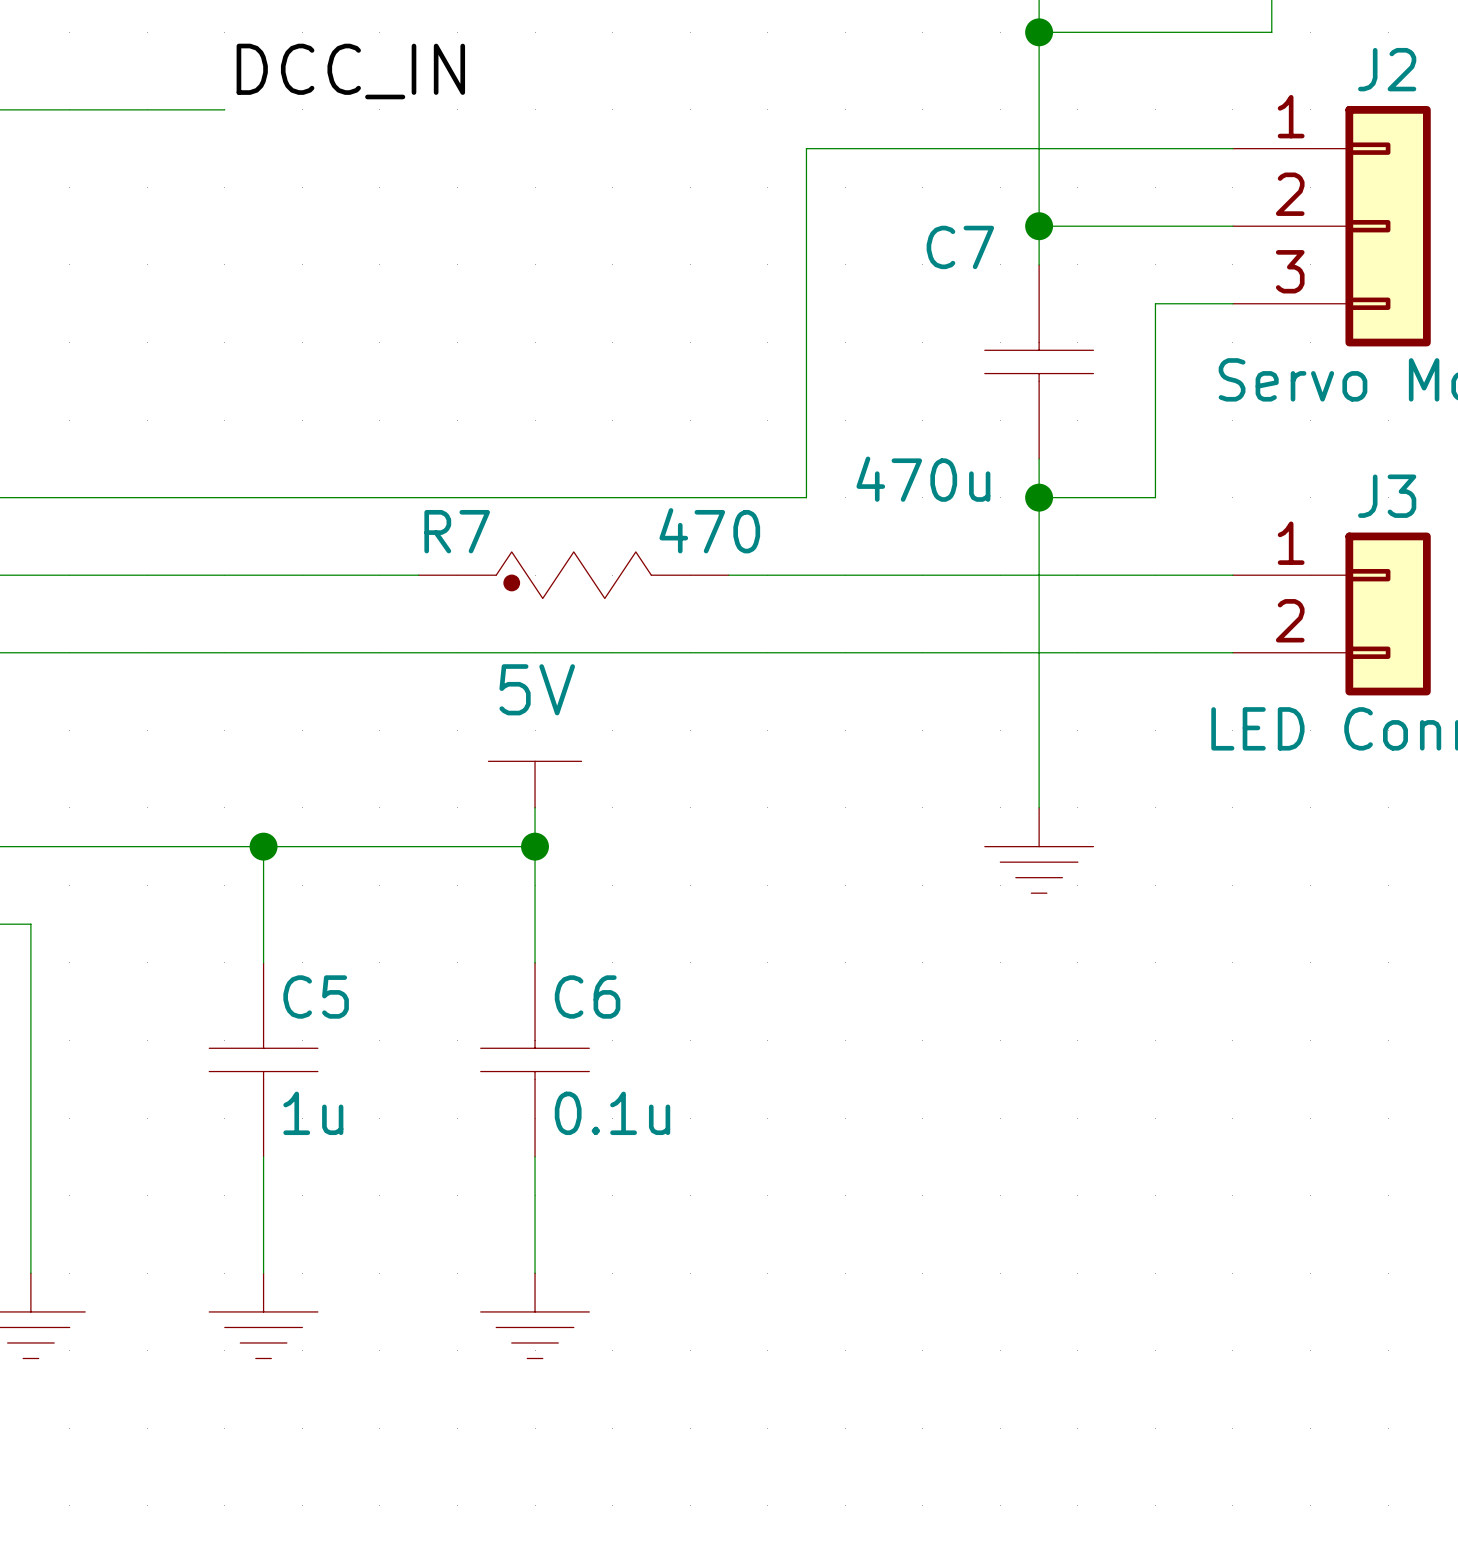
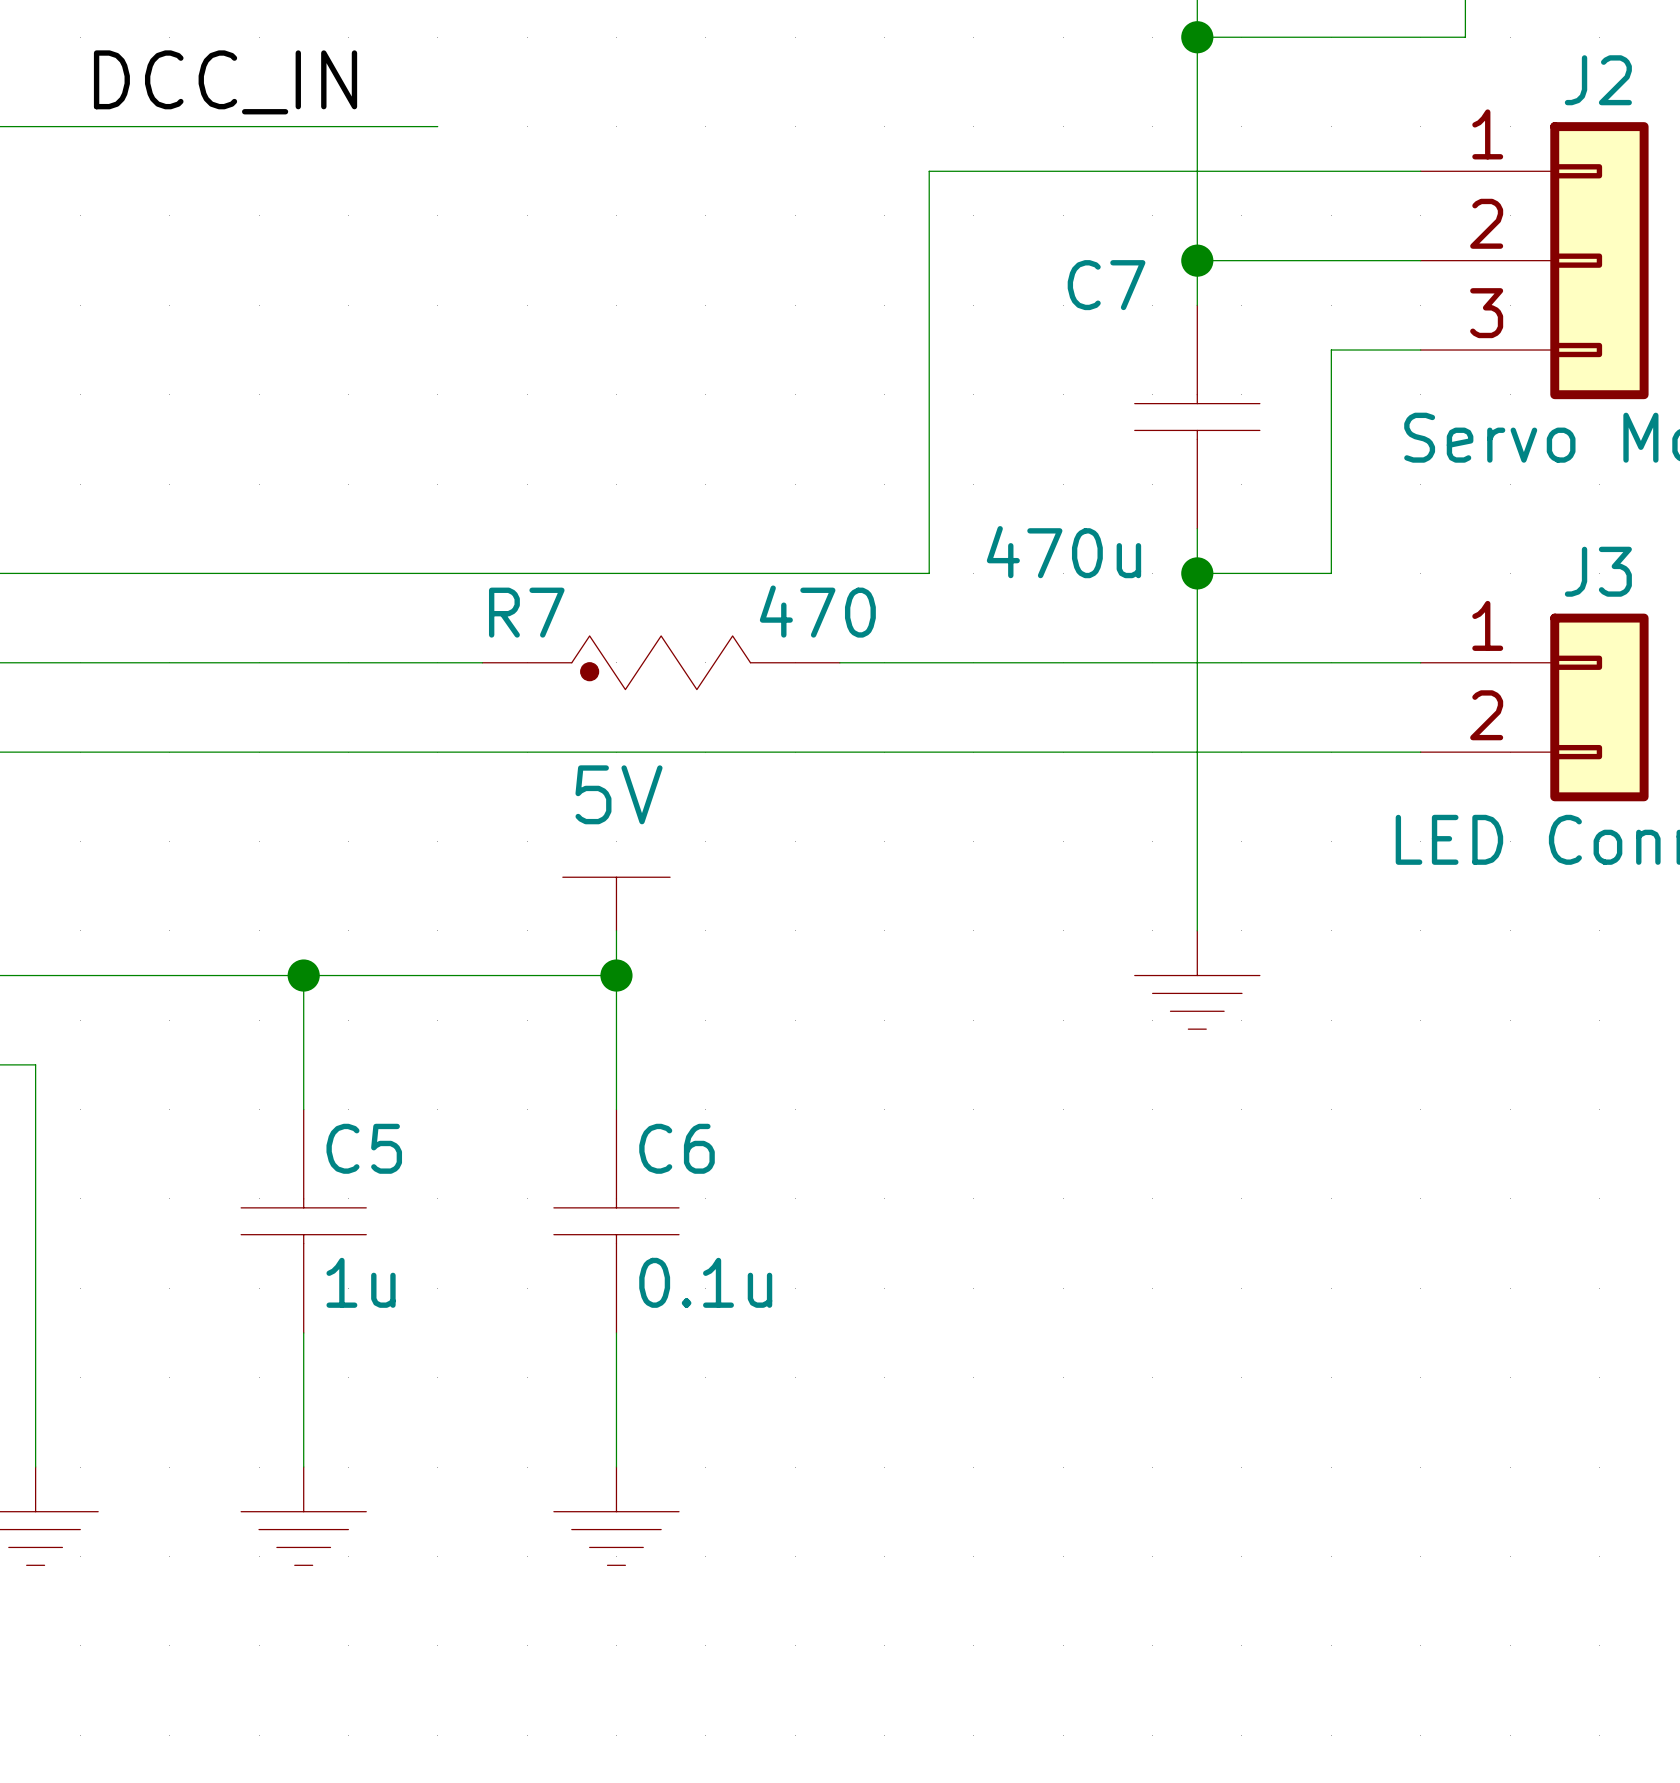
label position: DCC_IN (350, 71) -> DCC_IN (225, 82)
wire: none -> (259, 126) (437, 126)

